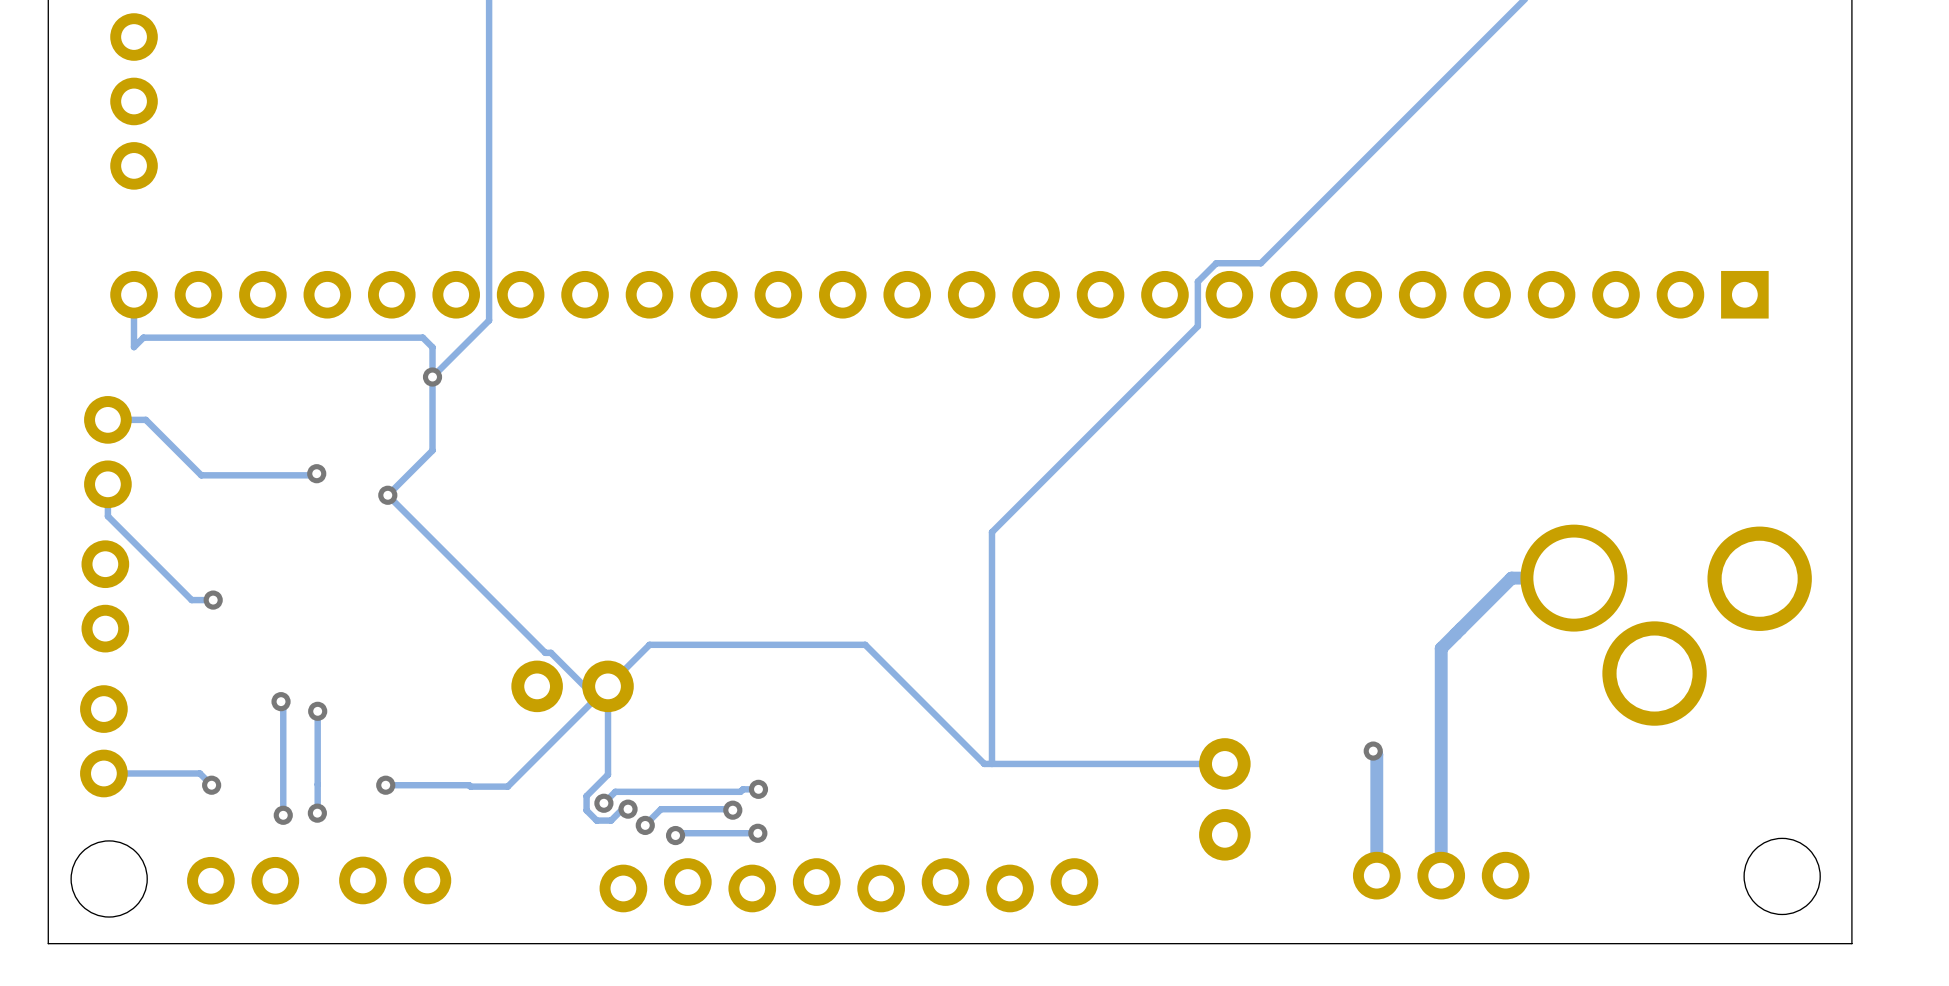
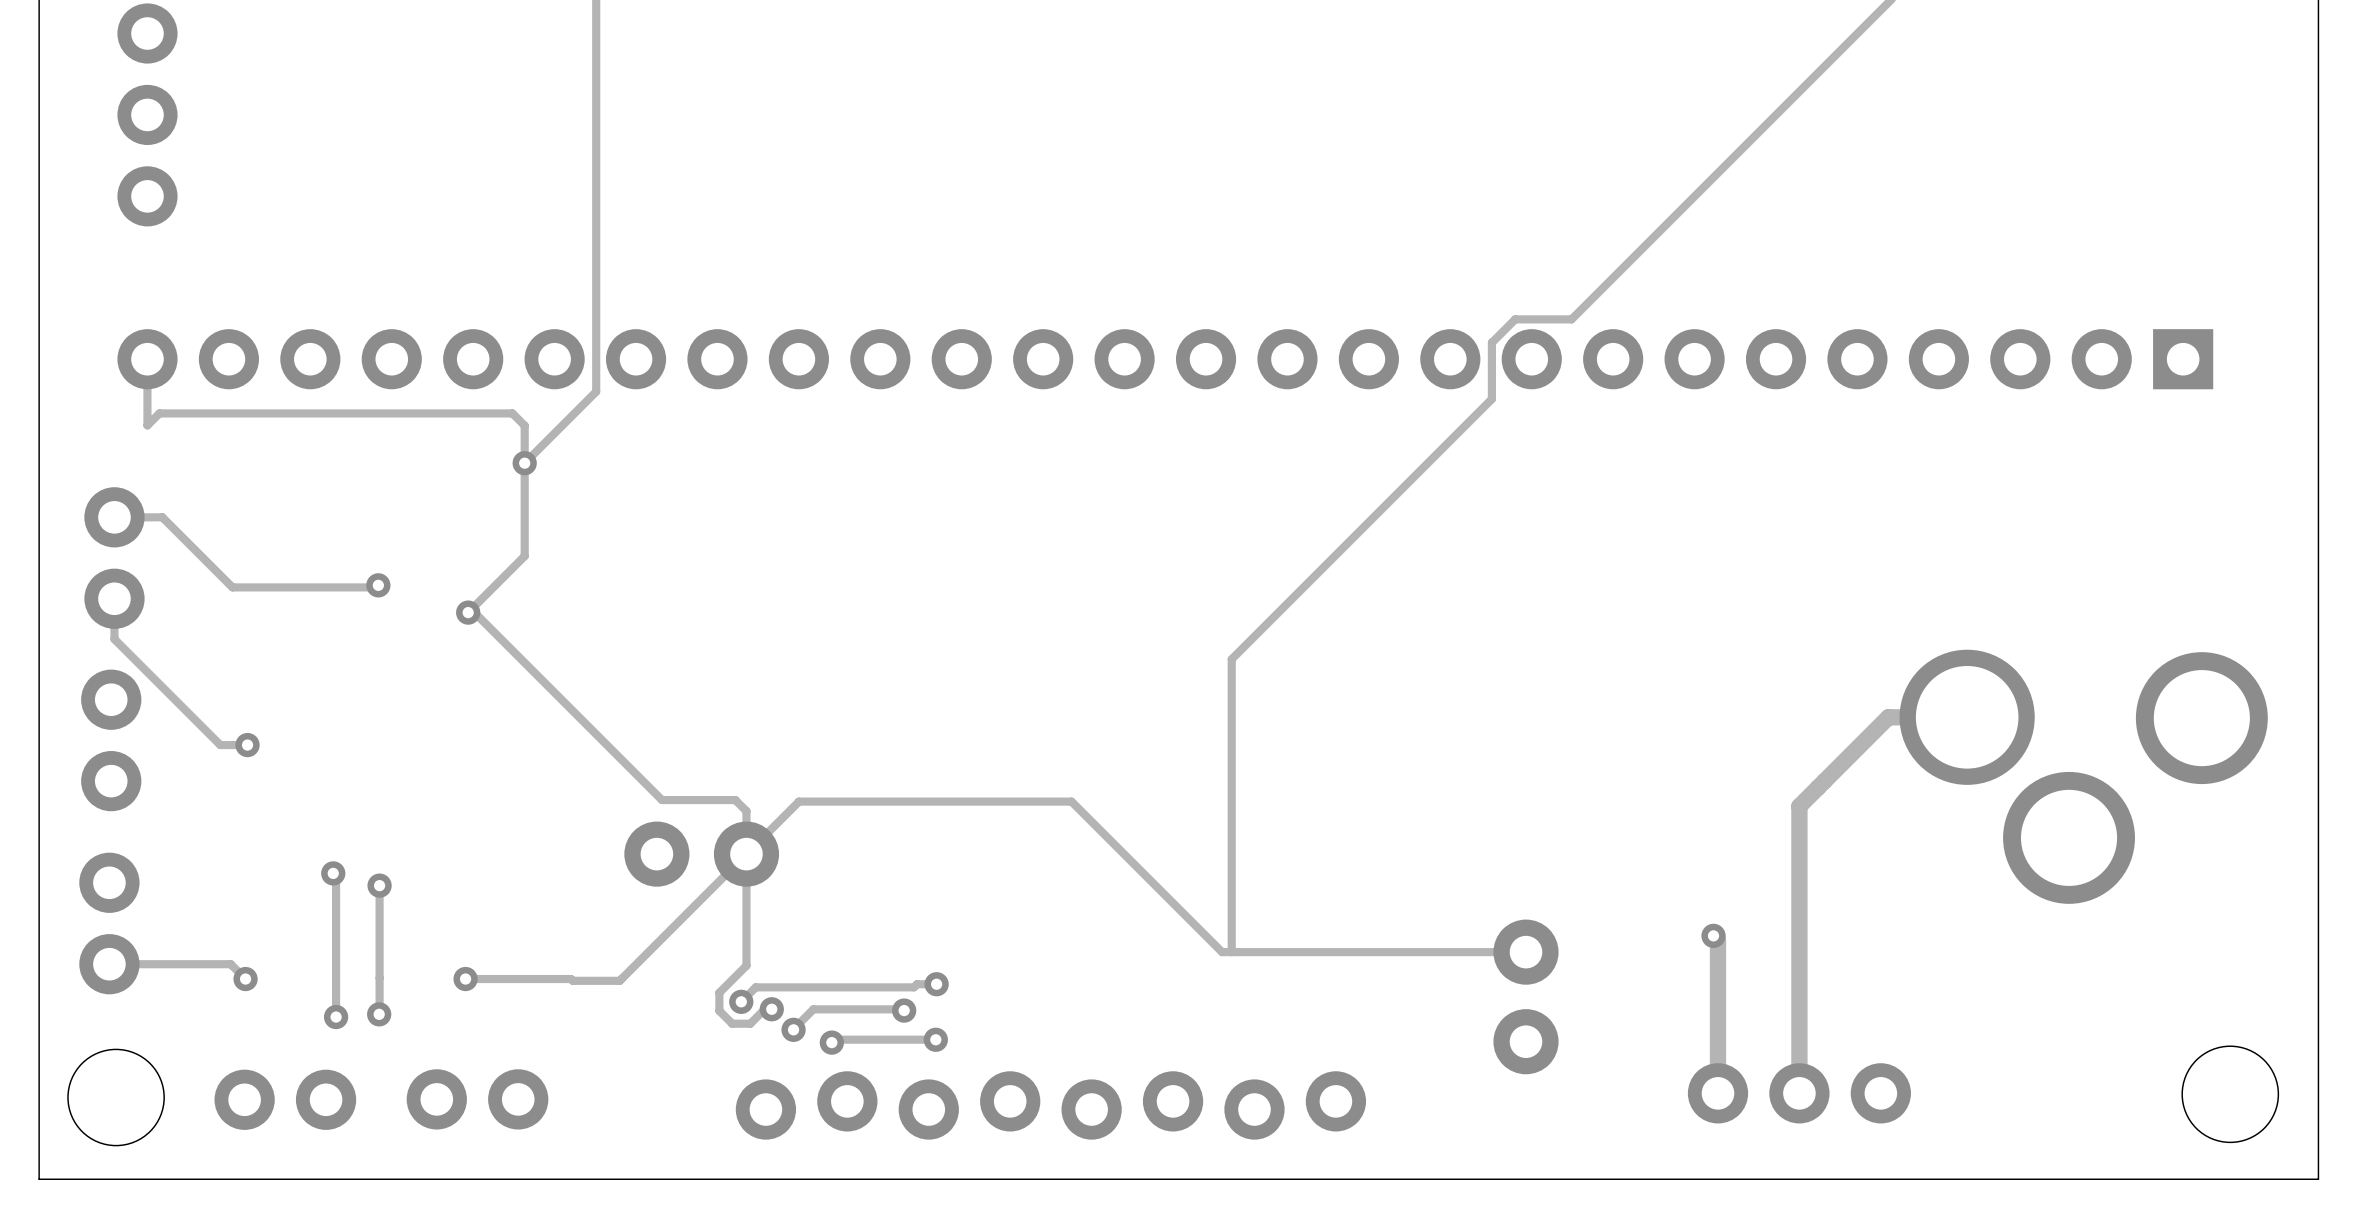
track: (387, 495) (545, 652) (551, 652) (586, 688) (605, 688) -> (468, 612) (474, 612) (661, 800) (735, 800) (746, 811) (746, 854)

